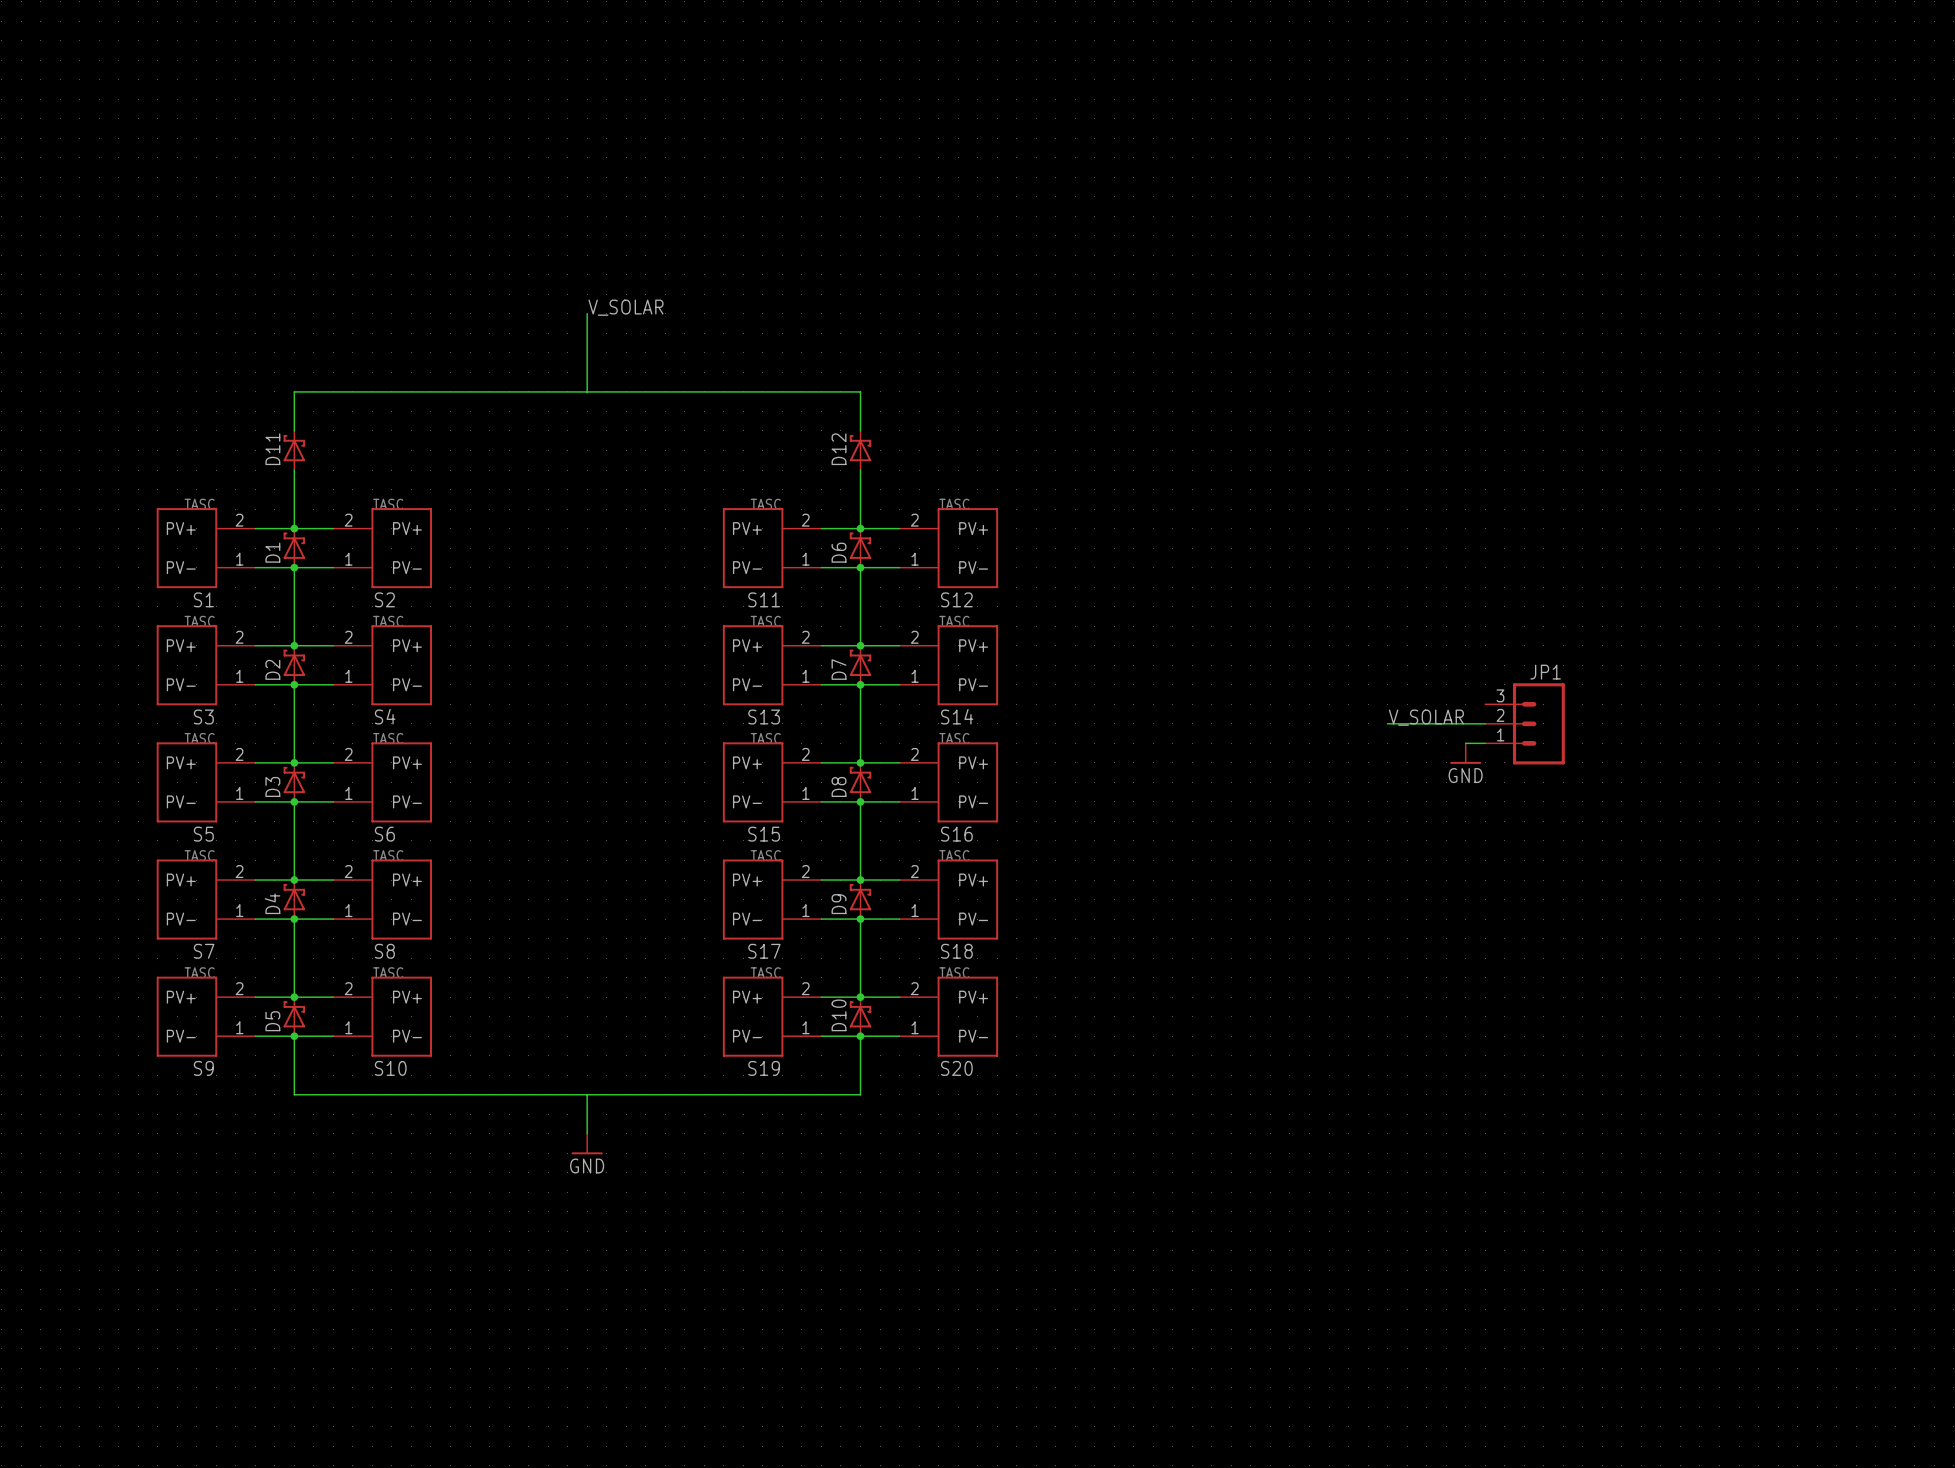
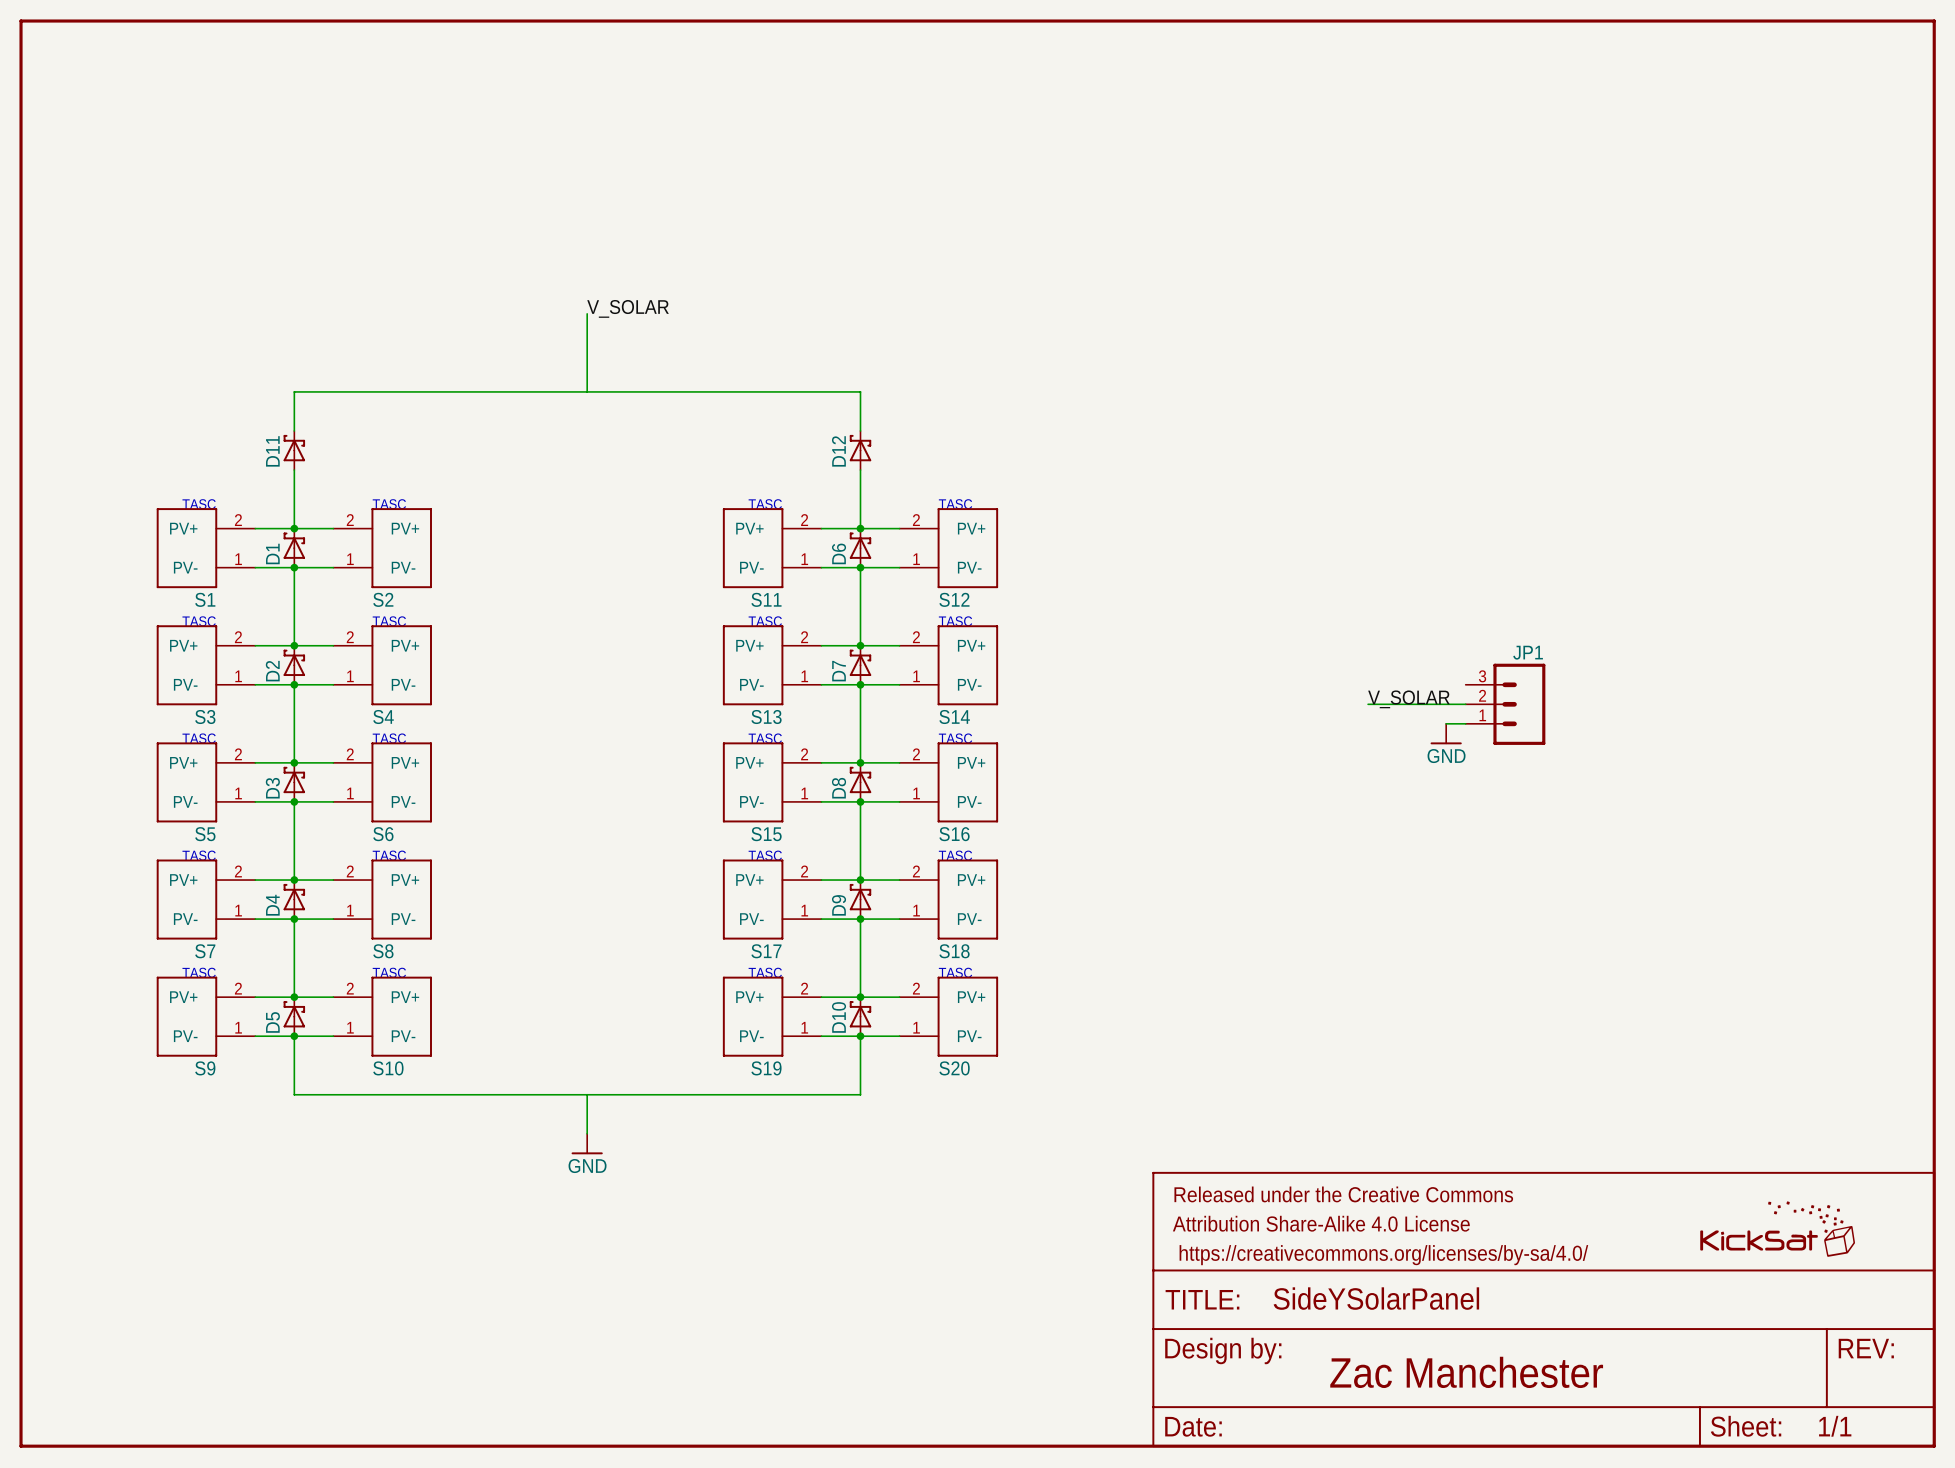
wire: none -> (1368, 704) (1465, 704)
label position: V_SOLAR (1426, 717) -> V_SOLAR (1408, 699)
wire: (1387, 723) (1446, 723) -> none
JP1 position: (1525, 723) -> (1505, 704)
part: none -> (977, 733)
wire: (1465, 743) (1485, 743) -> none
power symbol position: GND (1465, 753) -> GND (1446, 734)
part: none -> (1777, 1229)
part: none -> (1543, 1309)
text: none -> Zac Manchester (1466, 1372)

